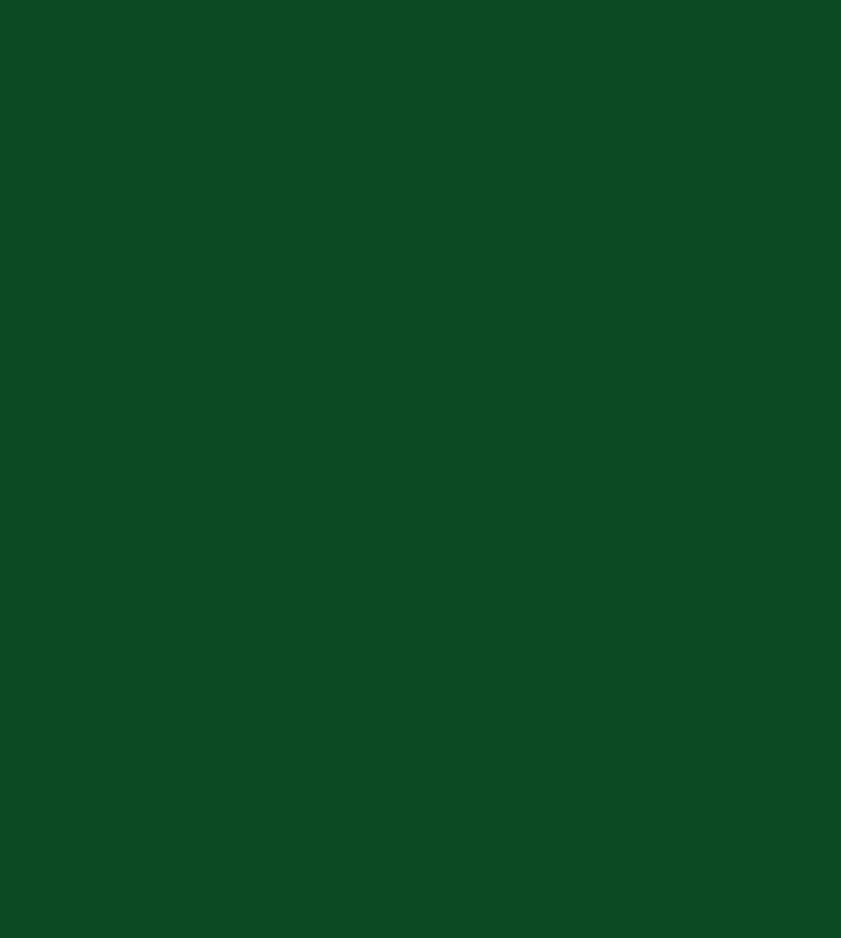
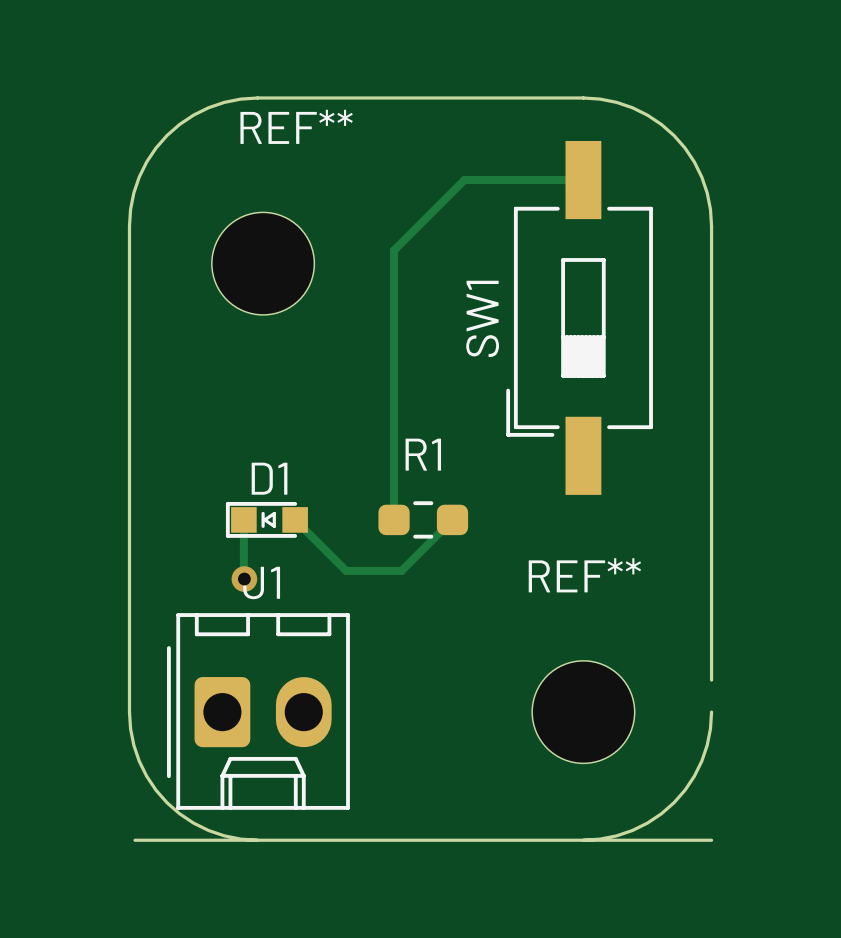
track: none -> (583, 180) (464, 180) (394, 250) (394, 519)
REF**: none -> (263, 263)
SW1: none -> (579, 317)
track: none -> (243, 519) (244, 579)
D1: none -> (266, 519)
track: none -> (295, 519) (346, 570) (401, 570) (452, 519)
R1: none -> (423, 519)
via: none -> (244, 579)
board edge: none -> (711, 680) (710, 209) (701, 177) (694, 162) (674, 135) (647, 115) (632, 107) (600, 99) (583, 97) (257, 97) (224, 102) (208, 107) (179, 124) (155, 148) (139, 177) (130, 209) (130, 728) (139, 761) (146, 776) (155, 790) (179, 813) (208, 830) (240, 839) (257, 840)
J1: none -> (258, 711)
REF**: none -> (583, 712)
board edge: none -> (711, 712) (707, 745) (701, 761) (685, 790) (674, 802) (661, 813) (632, 830) (616, 835) (583, 840)
board edge: none -> (134, 840) (711, 840)

